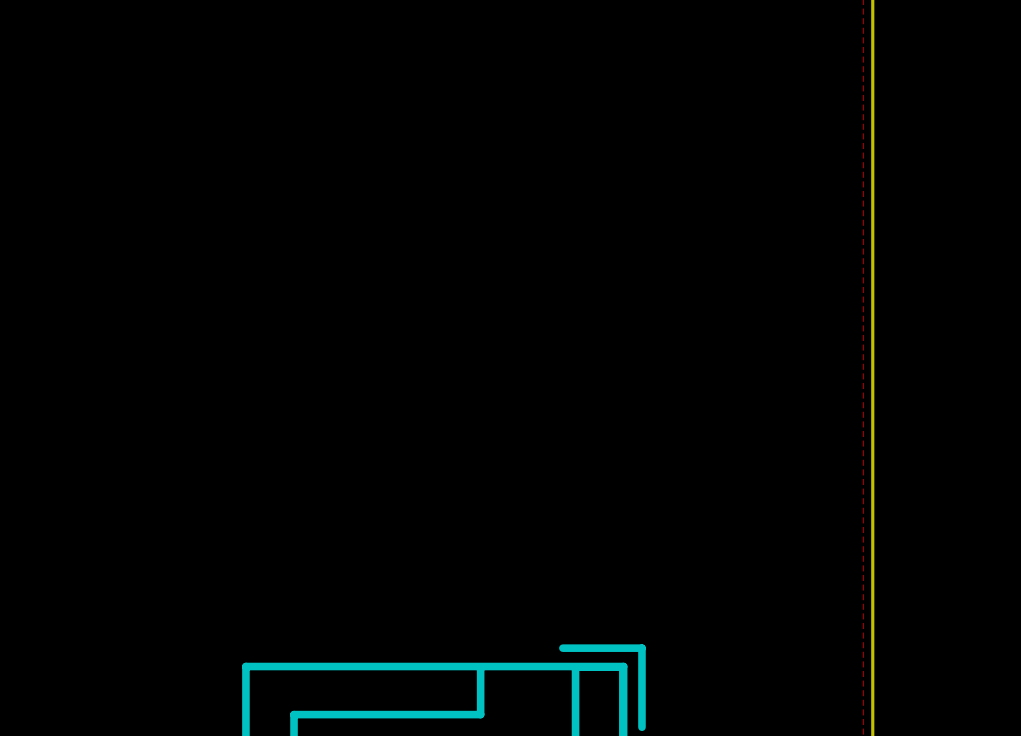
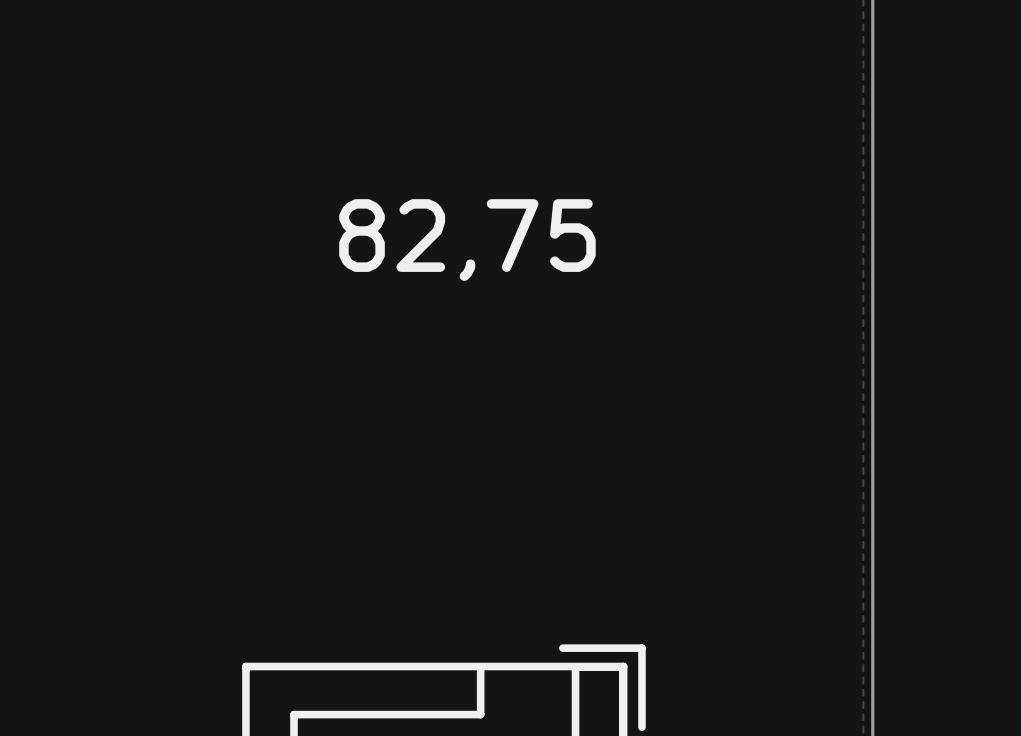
text: none -> 82,75 (467, 240)

